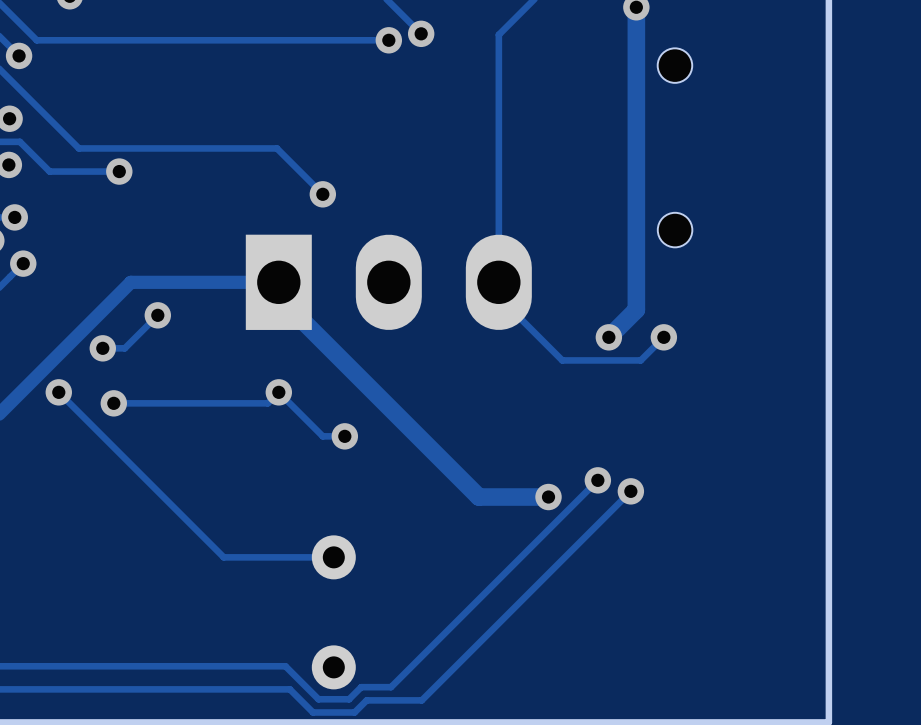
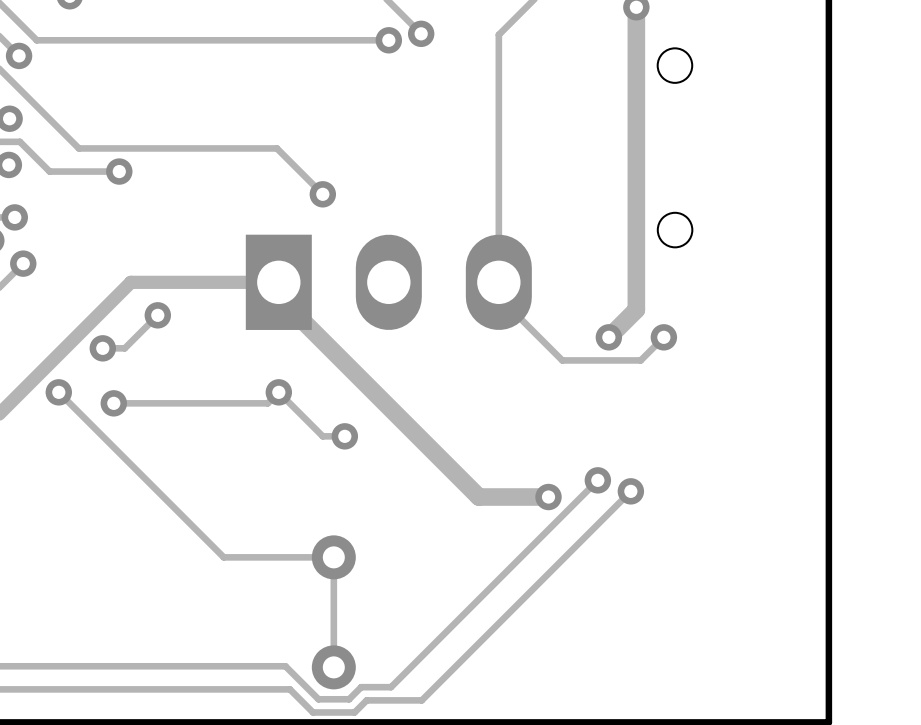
track: none -> (333, 557) (333, 667)

